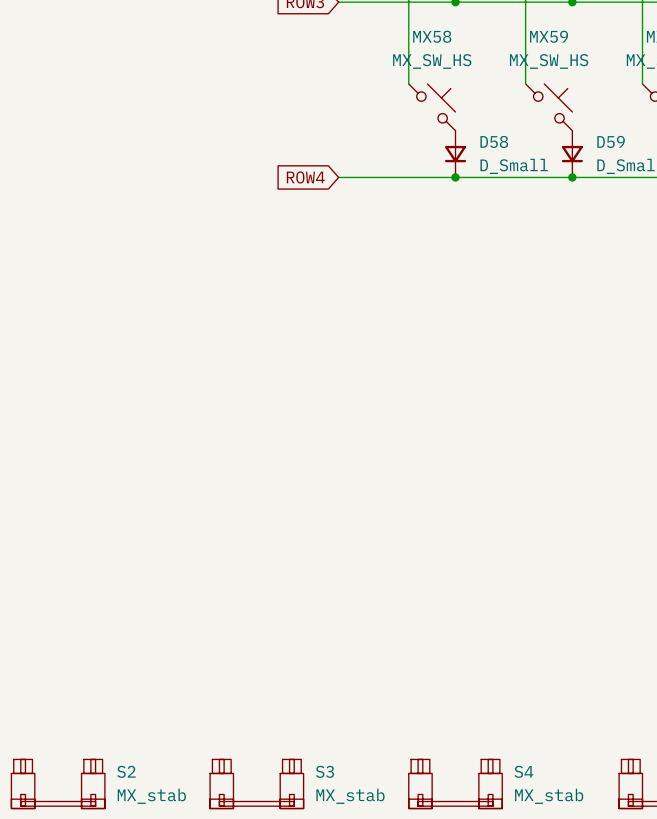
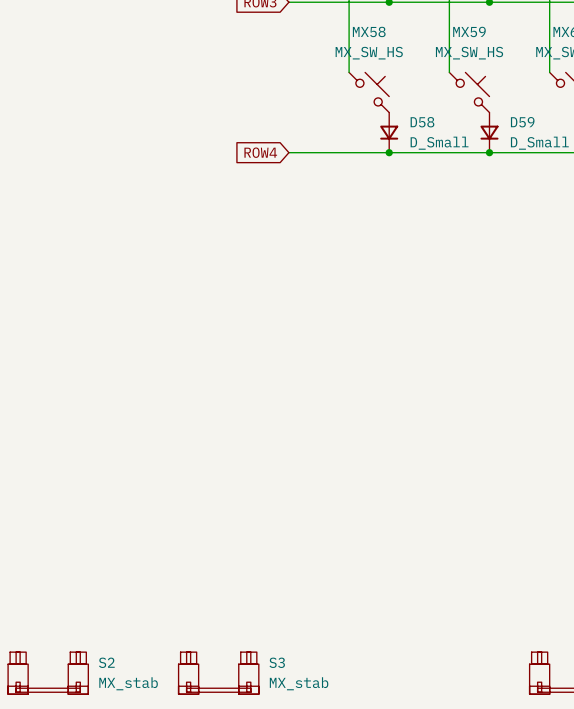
S4: MX_stab (455, 783) -> none

